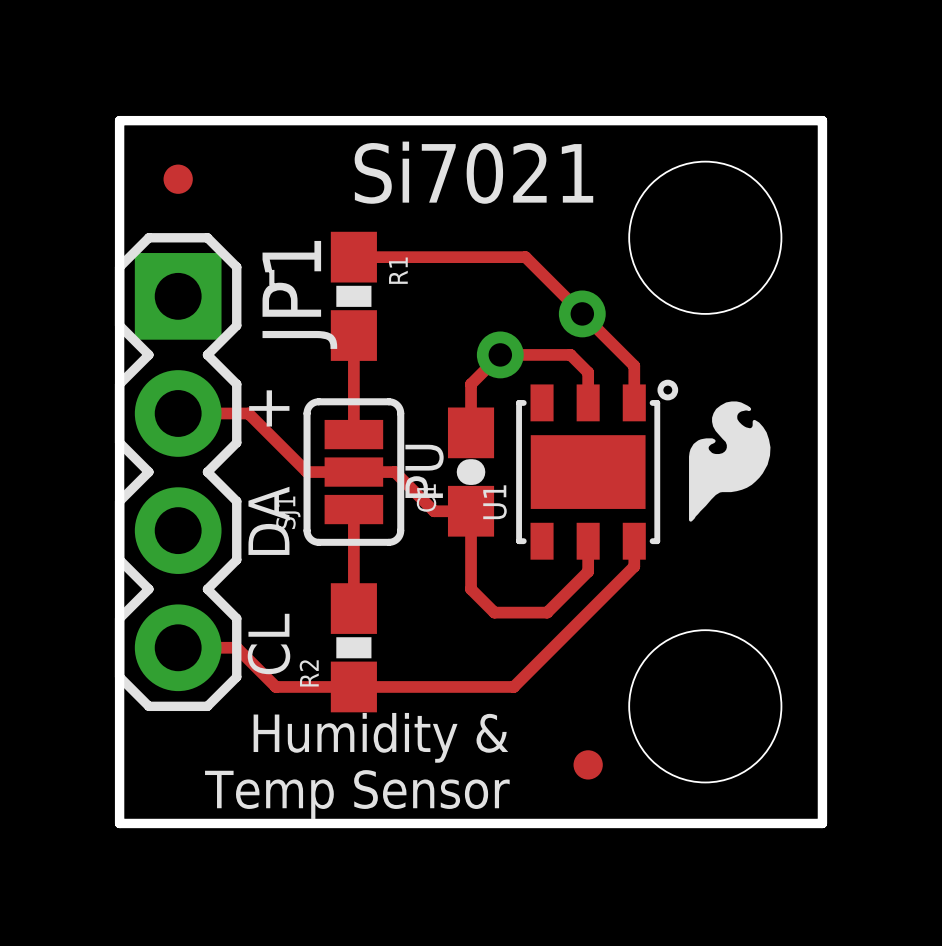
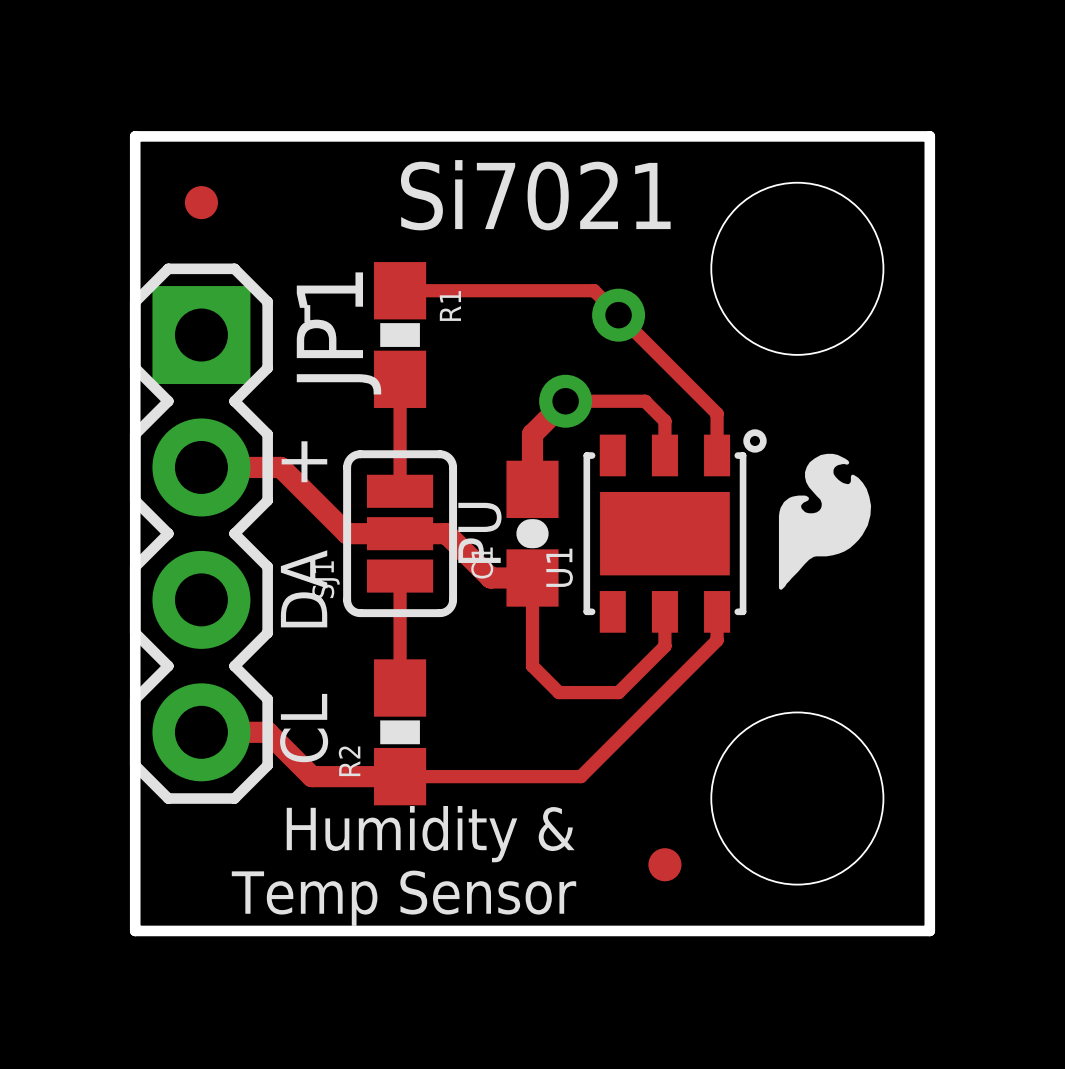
via position: (582, 313) -> (618, 315)
track width: thin (500, 354) (471, 384) (471, 432) -> thick (565, 401) (532, 434) (532, 489)
track width: thin (178, 413) (248, 413) (307, 472) (394, 472) (434, 511) (471, 511) -> thick (201, 467) (280, 467) (347, 533) (446, 533) (490, 577) (532, 577)
track width: thin (178, 647) (236, 647) (275, 686) (353, 686) -> thick (201, 732) (267, 732) (311, 776) (400, 776)

